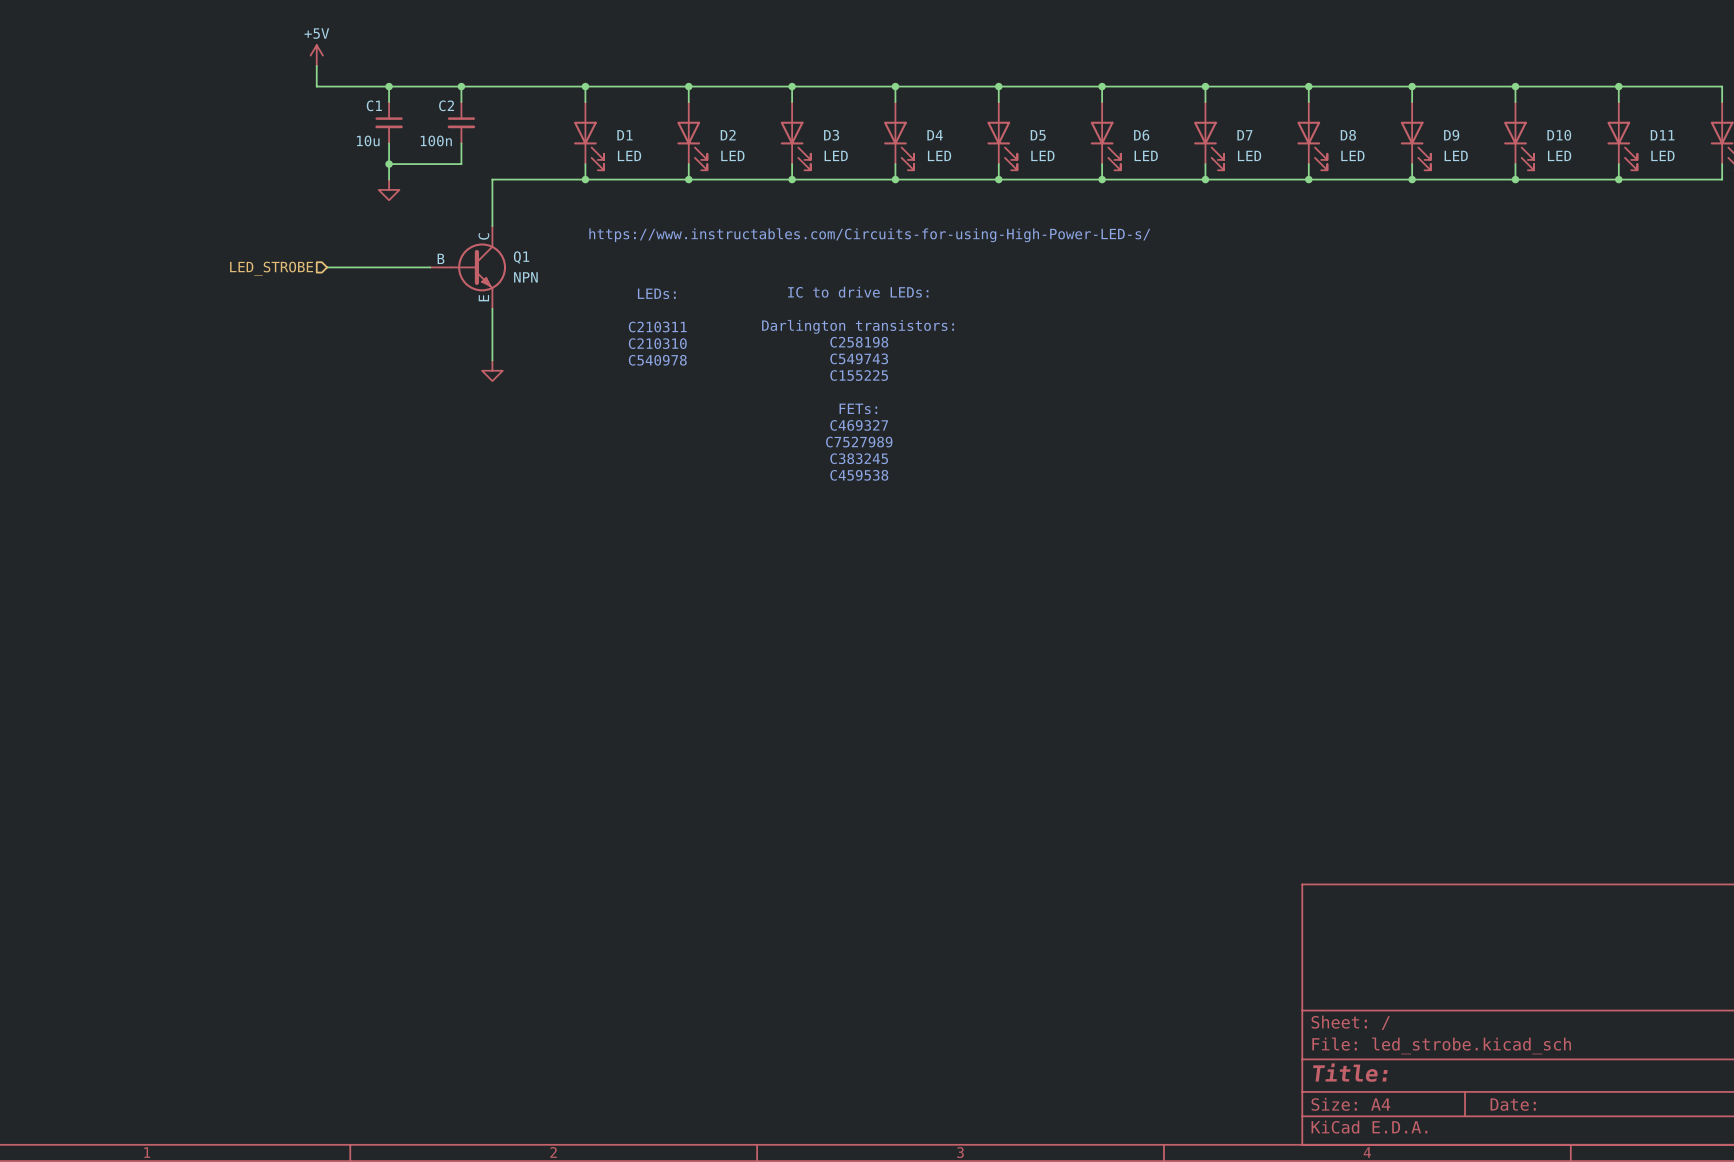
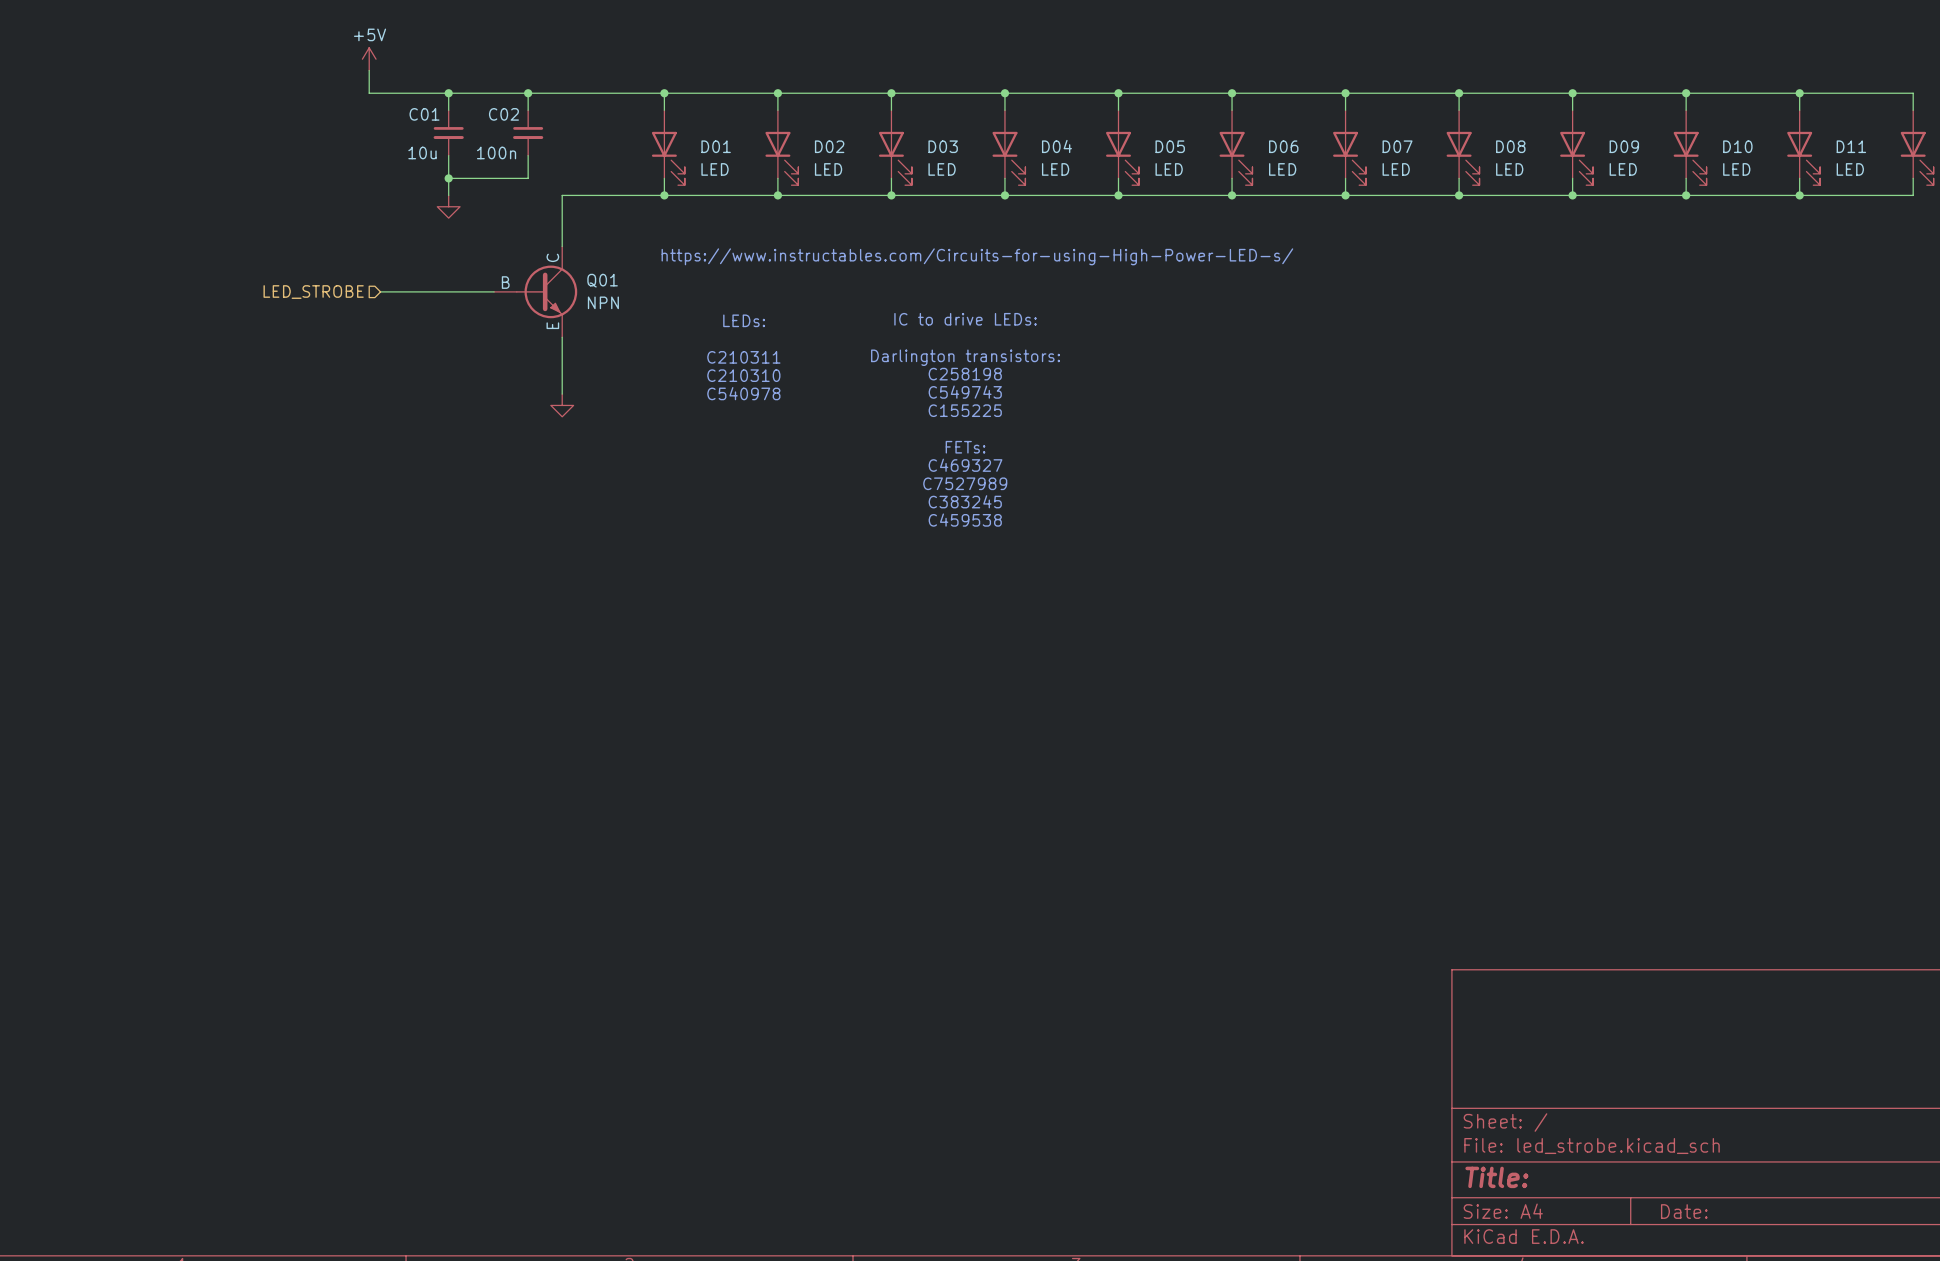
C1 name: C1 (374, 105) -> C01 (424, 114)
C2 name: C2 (446, 105) -> C02 (503, 114)
D1 name: D1 (624, 135) -> D01 (716, 146)
D2 name: D2 (728, 135) -> D02 (829, 146)
D3 name: D3 (831, 135) -> D03 (943, 146)
D4 name: D4 (935, 135) -> D04 (1056, 146)
D5 name: D5 (1038, 135) -> D05 (1170, 146)
D6 name: D6 (1141, 135) -> D06 (1283, 146)
D7 name: D7 (1244, 135) -> D07 (1397, 146)
D8 name: D8 (1348, 135) -> D08 (1510, 146)
D9 name: D9 (1451, 135) -> D09 (1624, 146)
Q1 name: Q1 (521, 257) -> Q01 (602, 280)

